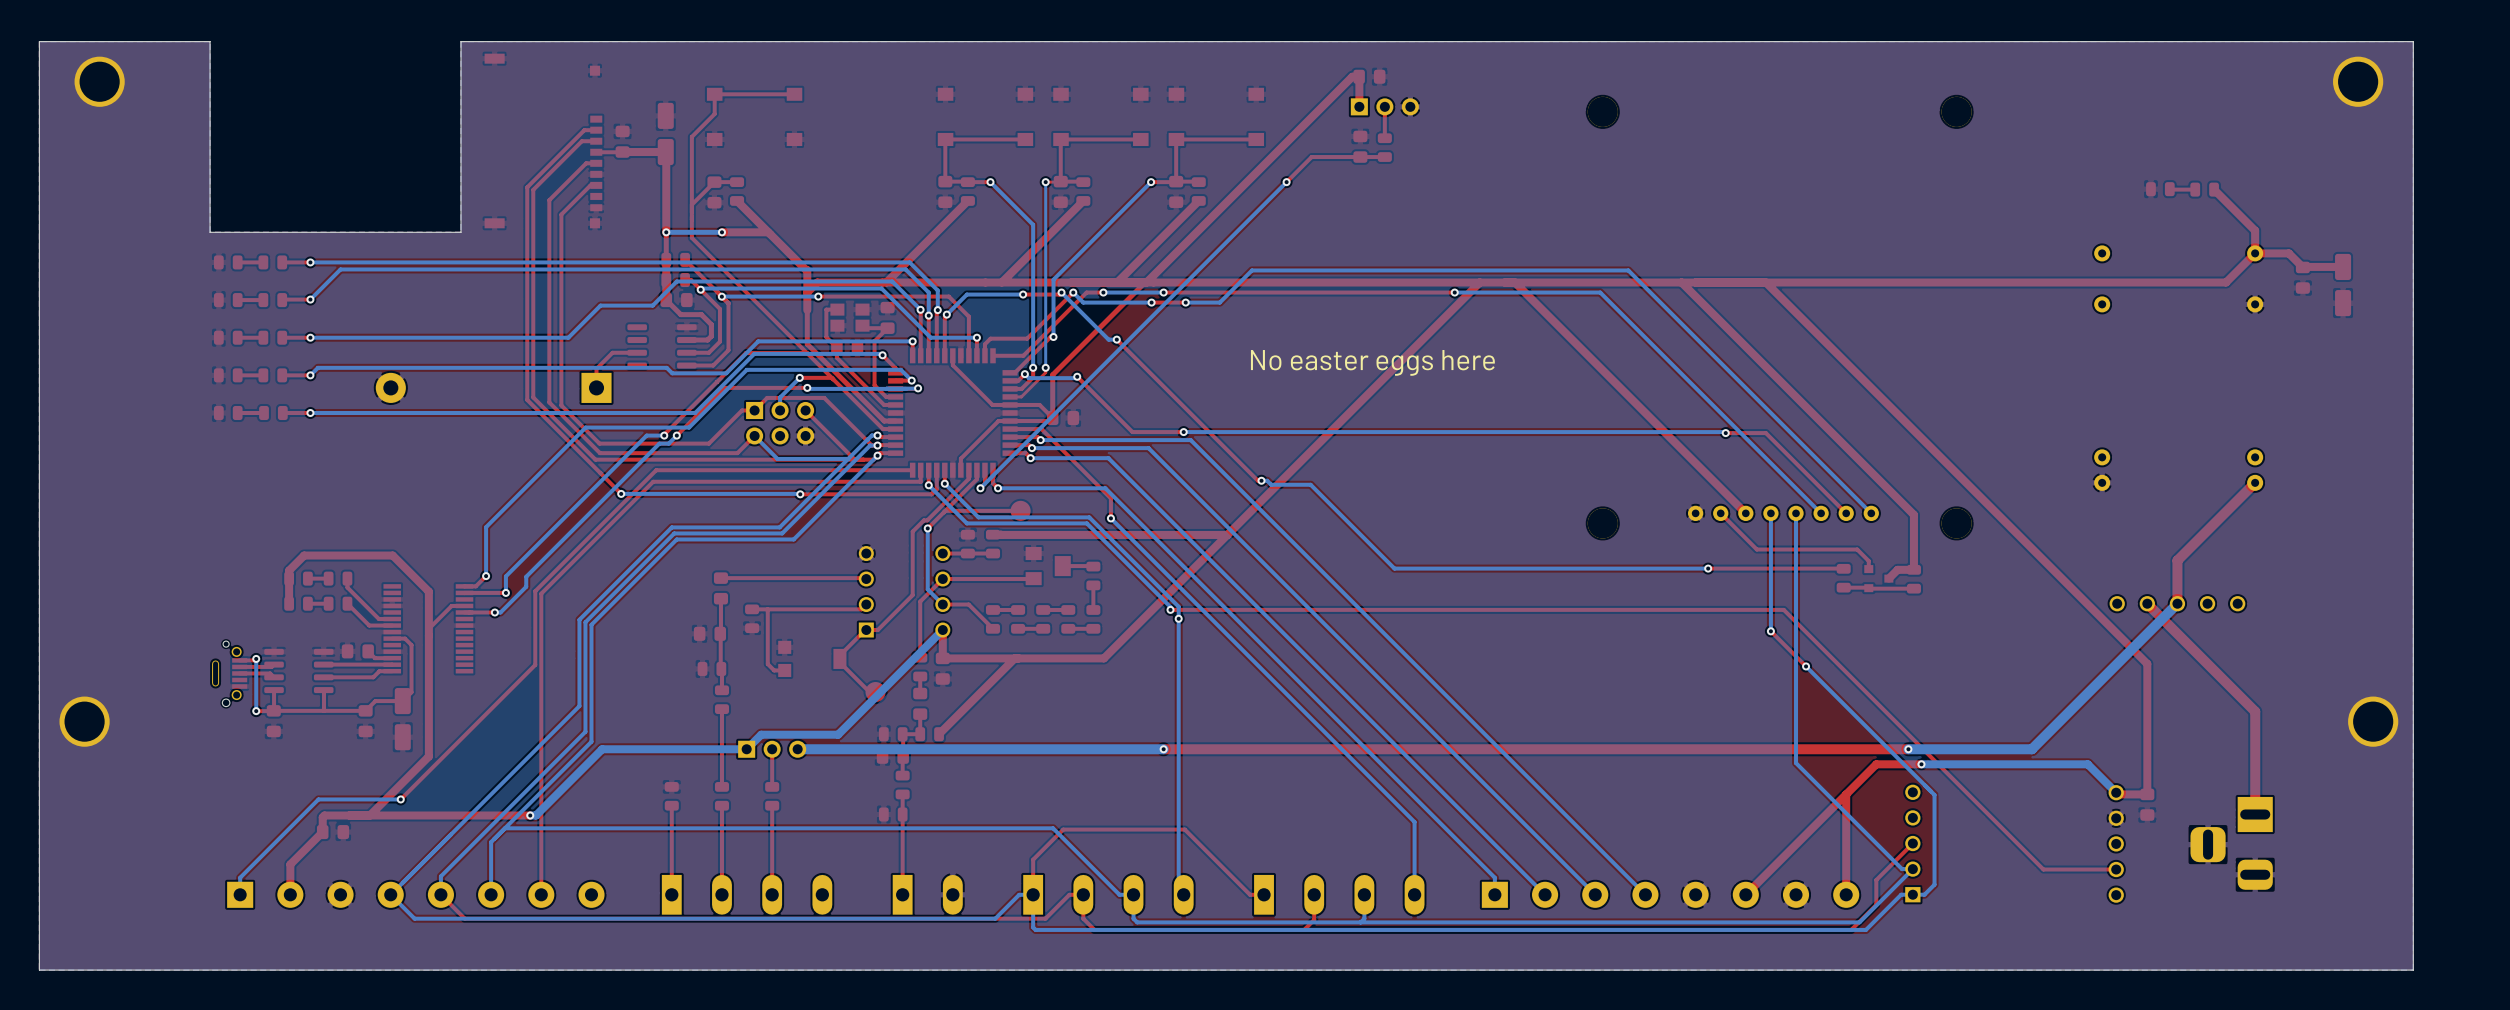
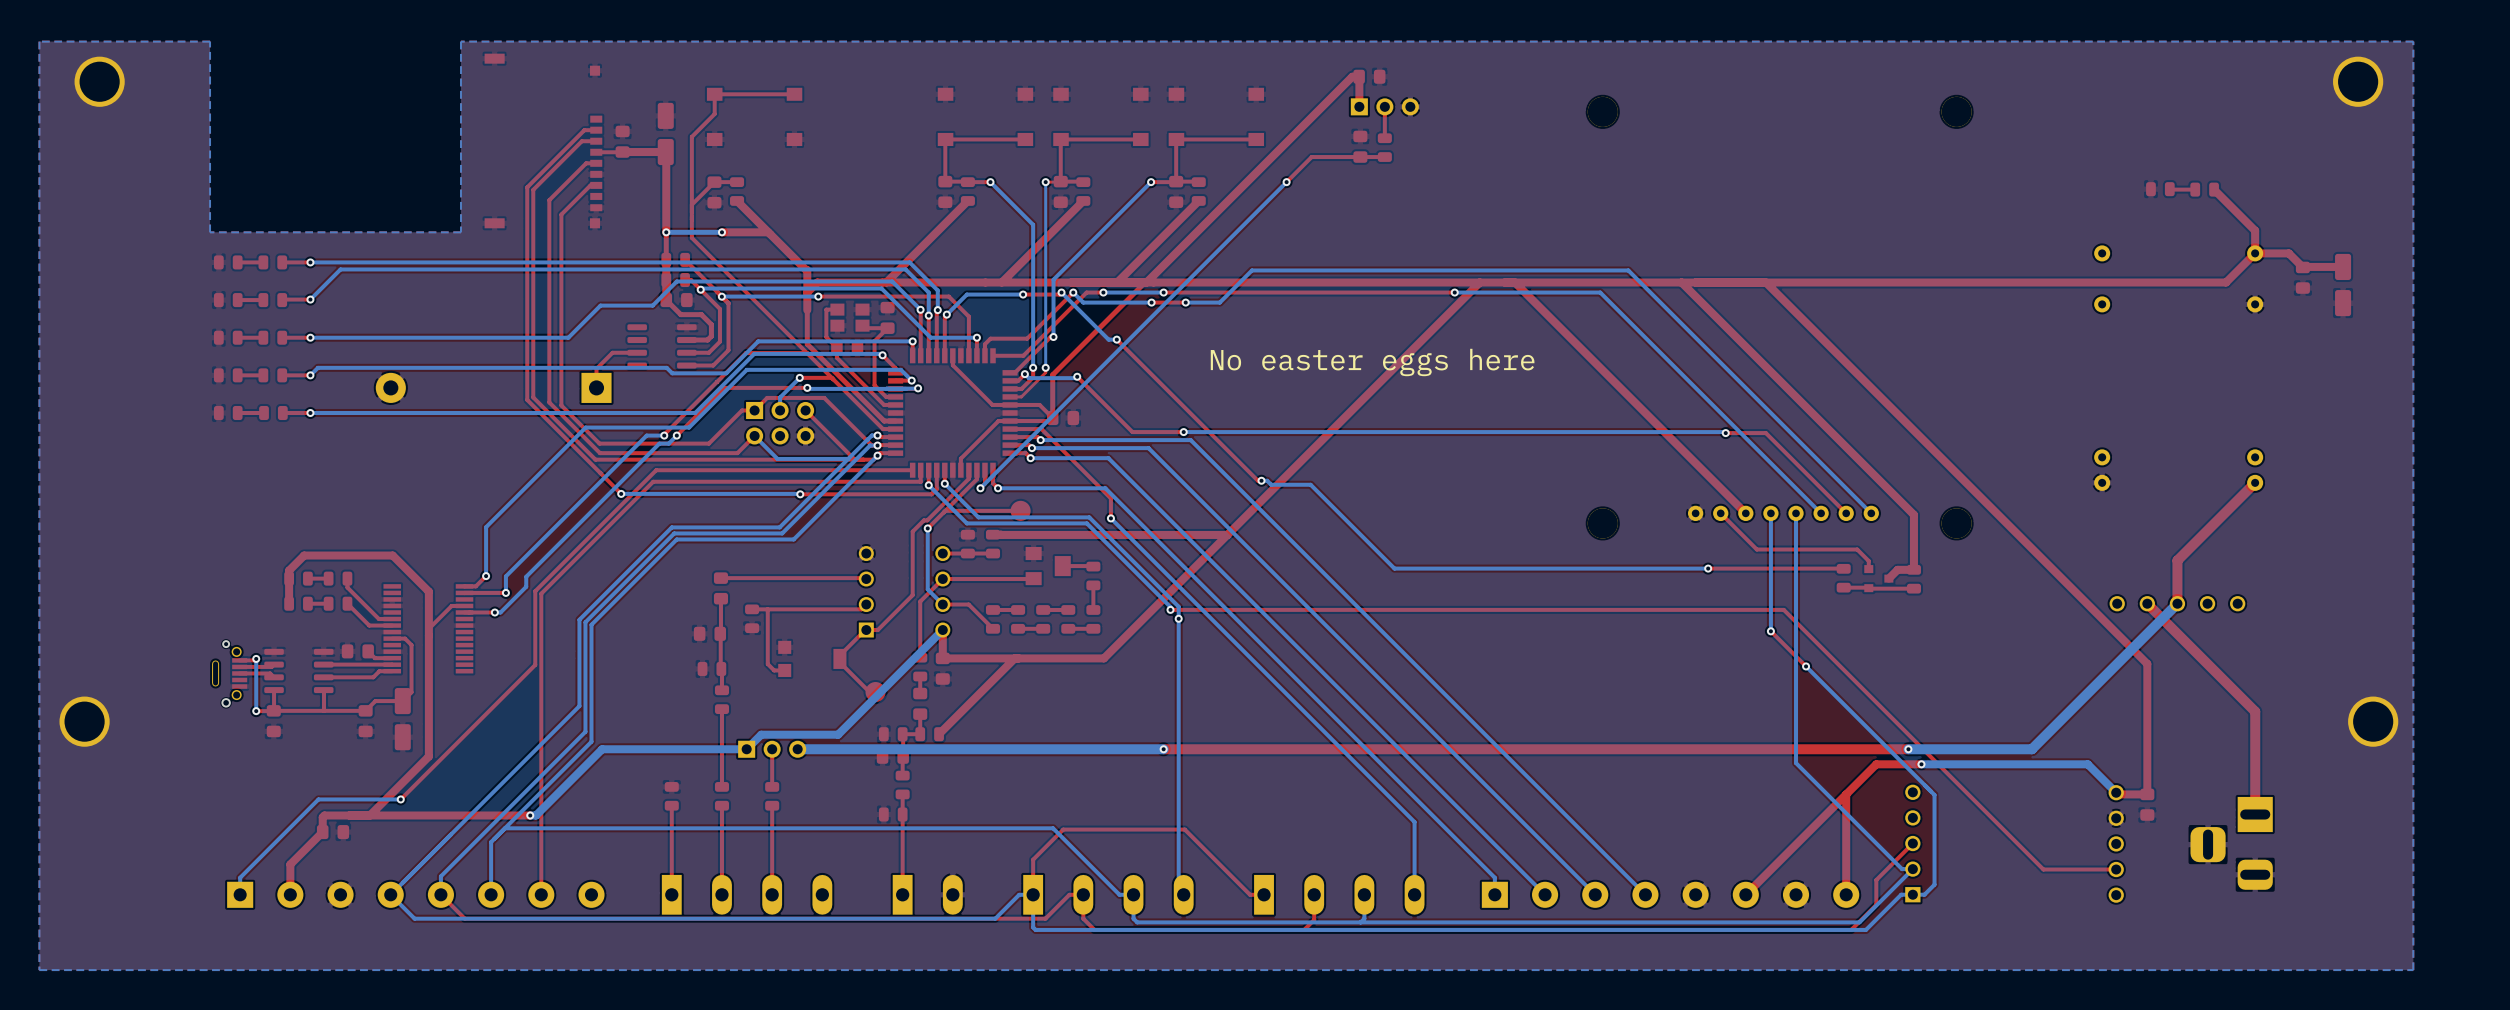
board edge: (2413, 41) (2413, 970) (39, 970) (39, 41) (210, 41) (210, 232) (461, 232) (461, 41) (2413, 41) -> none

